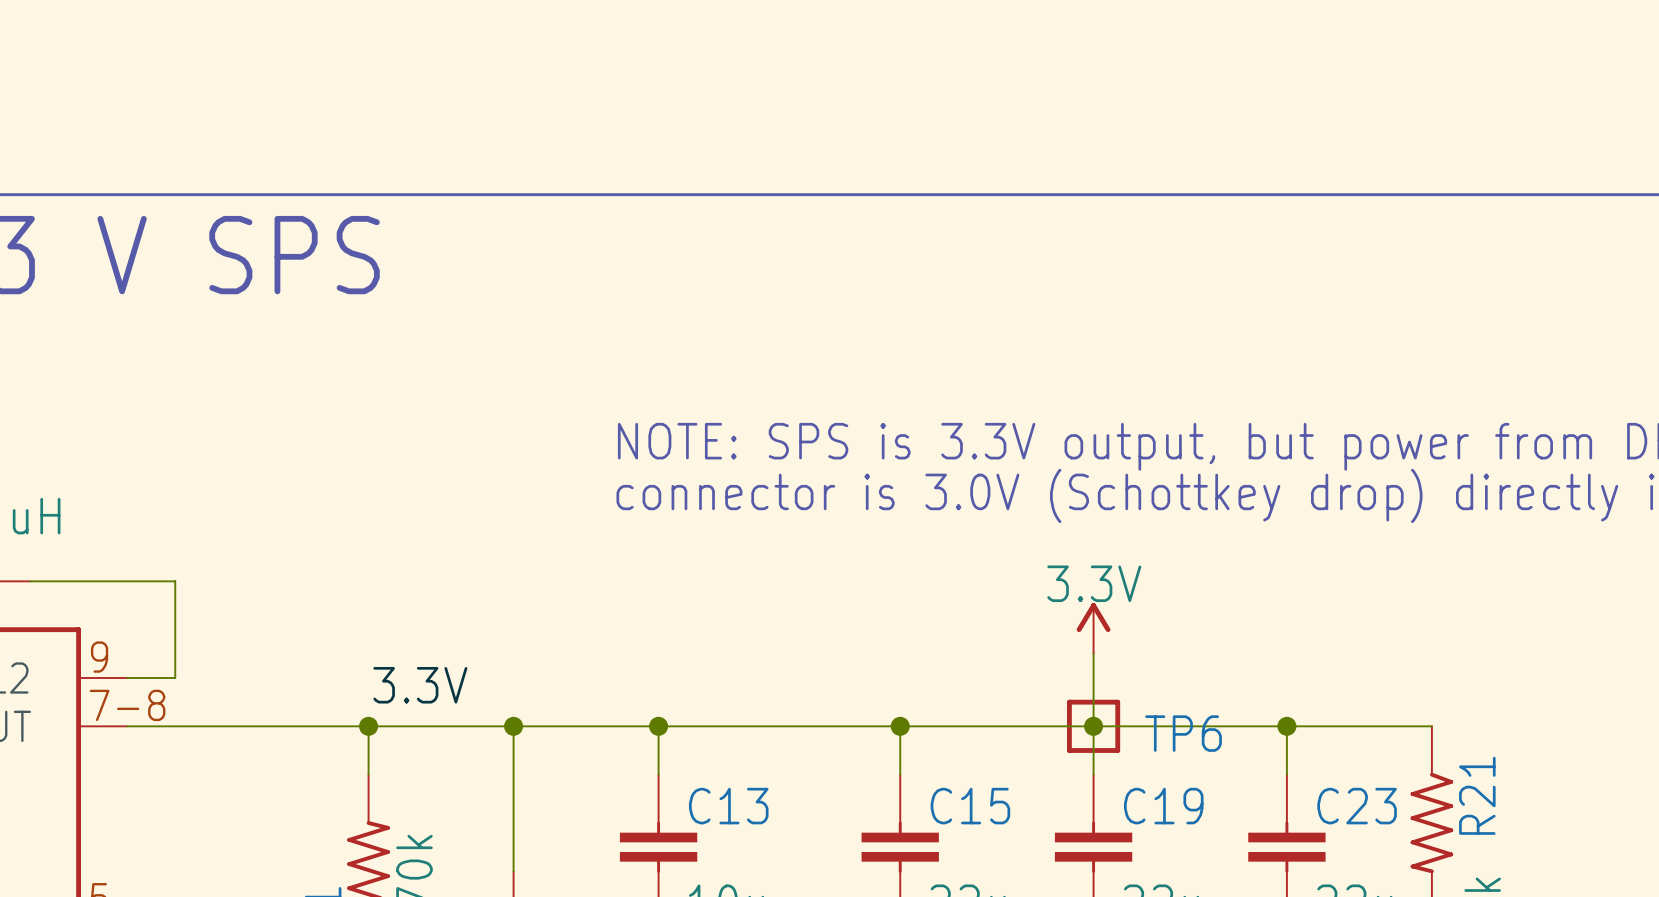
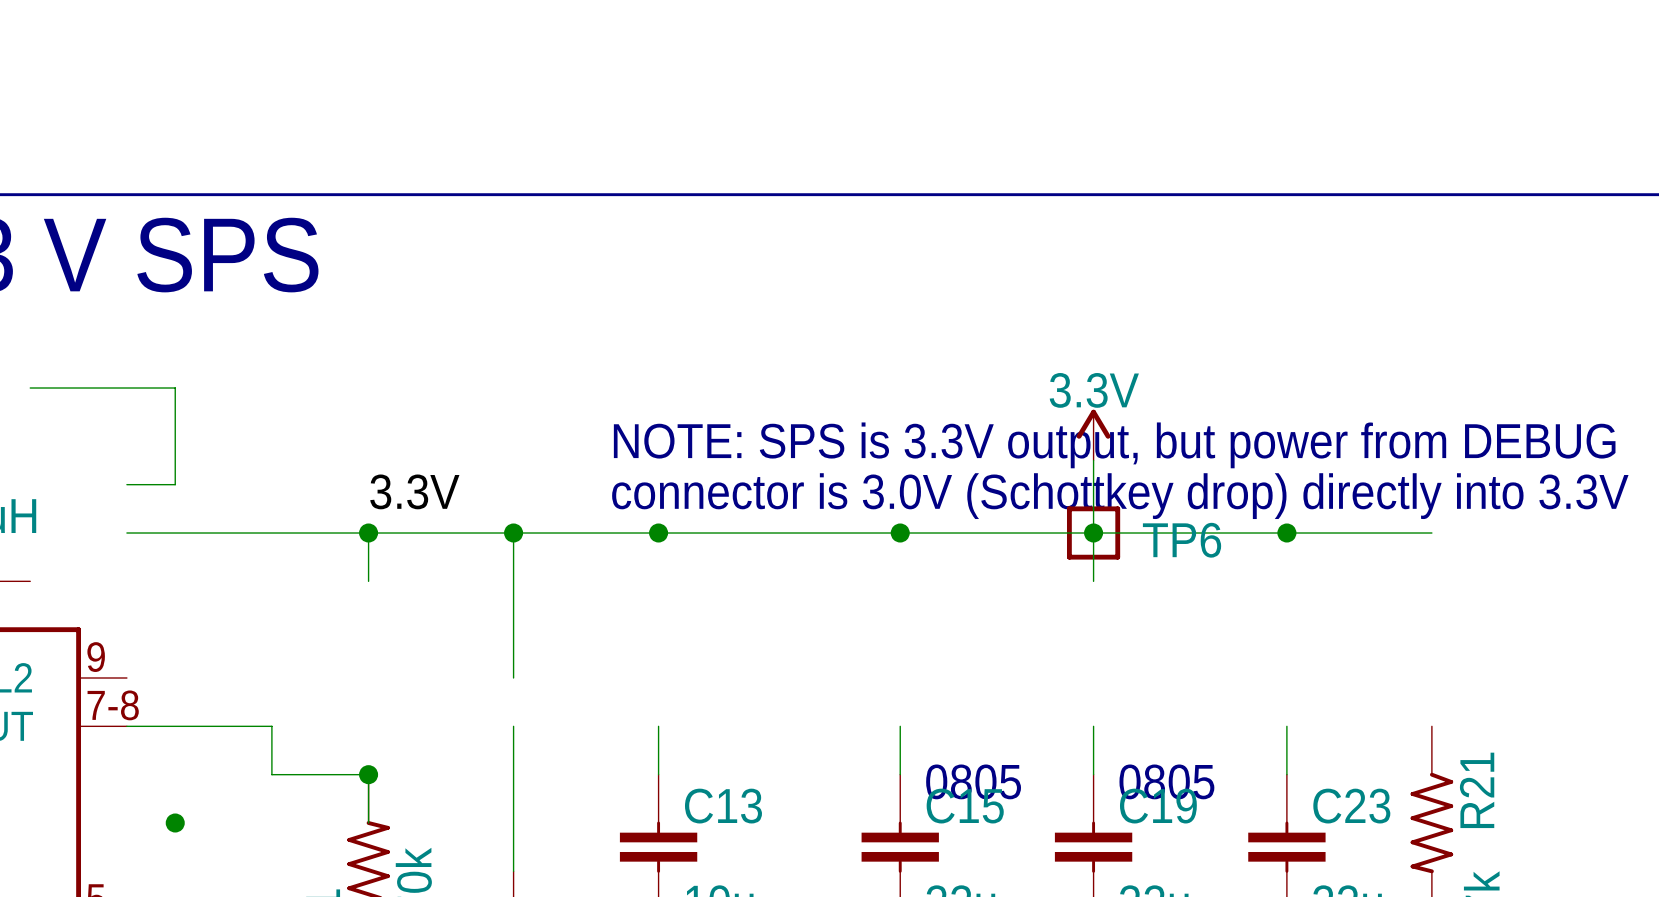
wire: none -> (1093, 460) (1093, 581)
wire: none -> (126, 533) (1431, 533)
junction: none -> (368, 533)
wire: none -> (513, 533) (513, 678)
junction: none -> (513, 533)
junction: none -> (658, 533)
junction: none -> (900, 533)
junction: none -> (1093, 533)
junction: none -> (1286, 533)
wire: (30, 581) (175, 581) (175, 678) (126, 678) -> (30, 388) (175, 388) (175, 484) (126, 484)
power symbol position: 3.3V (1093, 628) -> 3.3V (1093, 435)
wire: (1093, 653) (1093, 726) -> none
label position: 3.3V (420, 685) -> 3.3V (414, 491)
wire: (271, 726) (1431, 726) -> (271, 726) (271, 774) (368, 774) (368, 823)
wire: (368, 726) (368, 774) -> (368, 533) (368, 581)
junction position: (368, 726) -> (368, 774)
junction: (513, 726) -> none
junction: (658, 726) -> none
junction: (900, 726) -> none
TP6 position: (1093, 726) -> (1093, 533)
junction: (1093, 726) -> none
junction: (1286, 726) -> none
text: none -> 0805 (973, 781)
text: none -> 0805 (1166, 781)
junction: none -> (175, 823)

